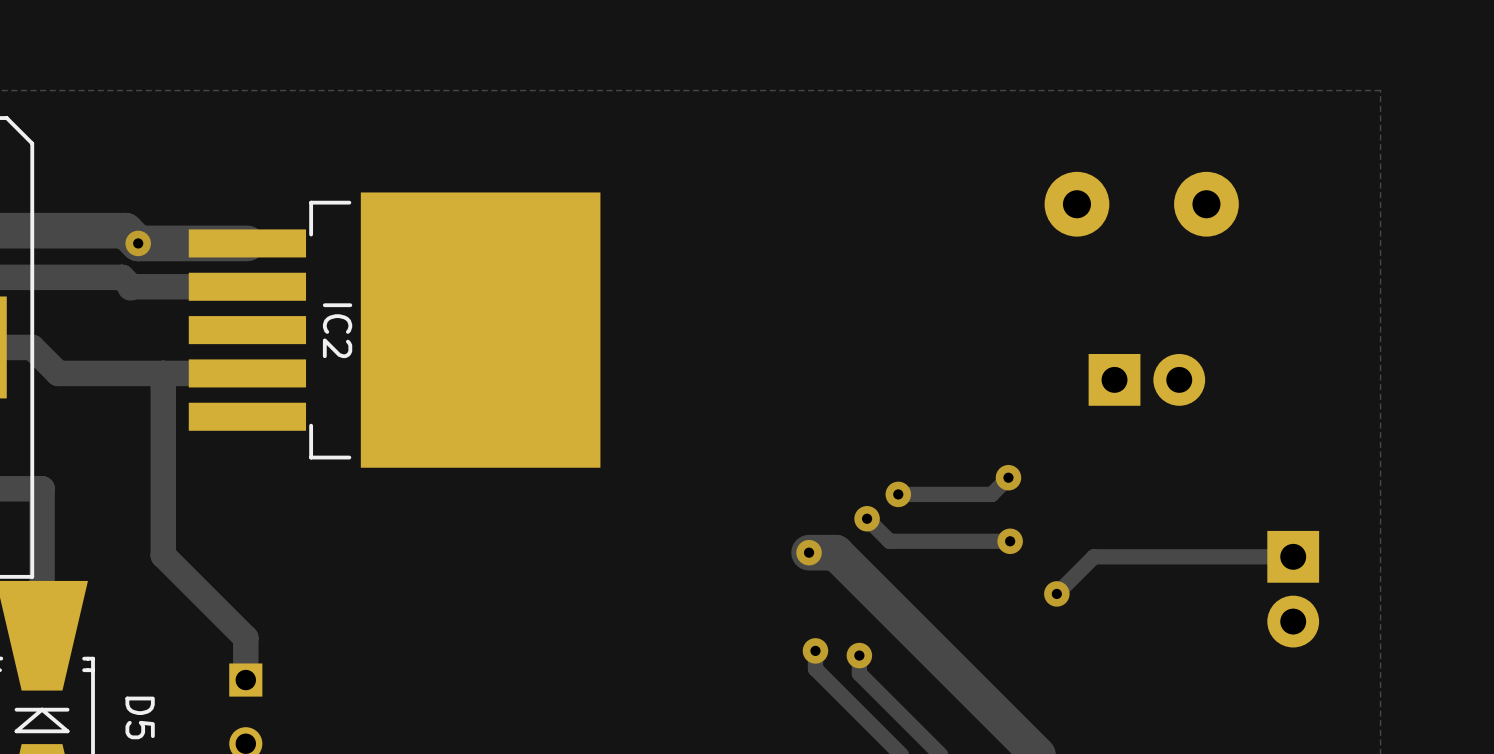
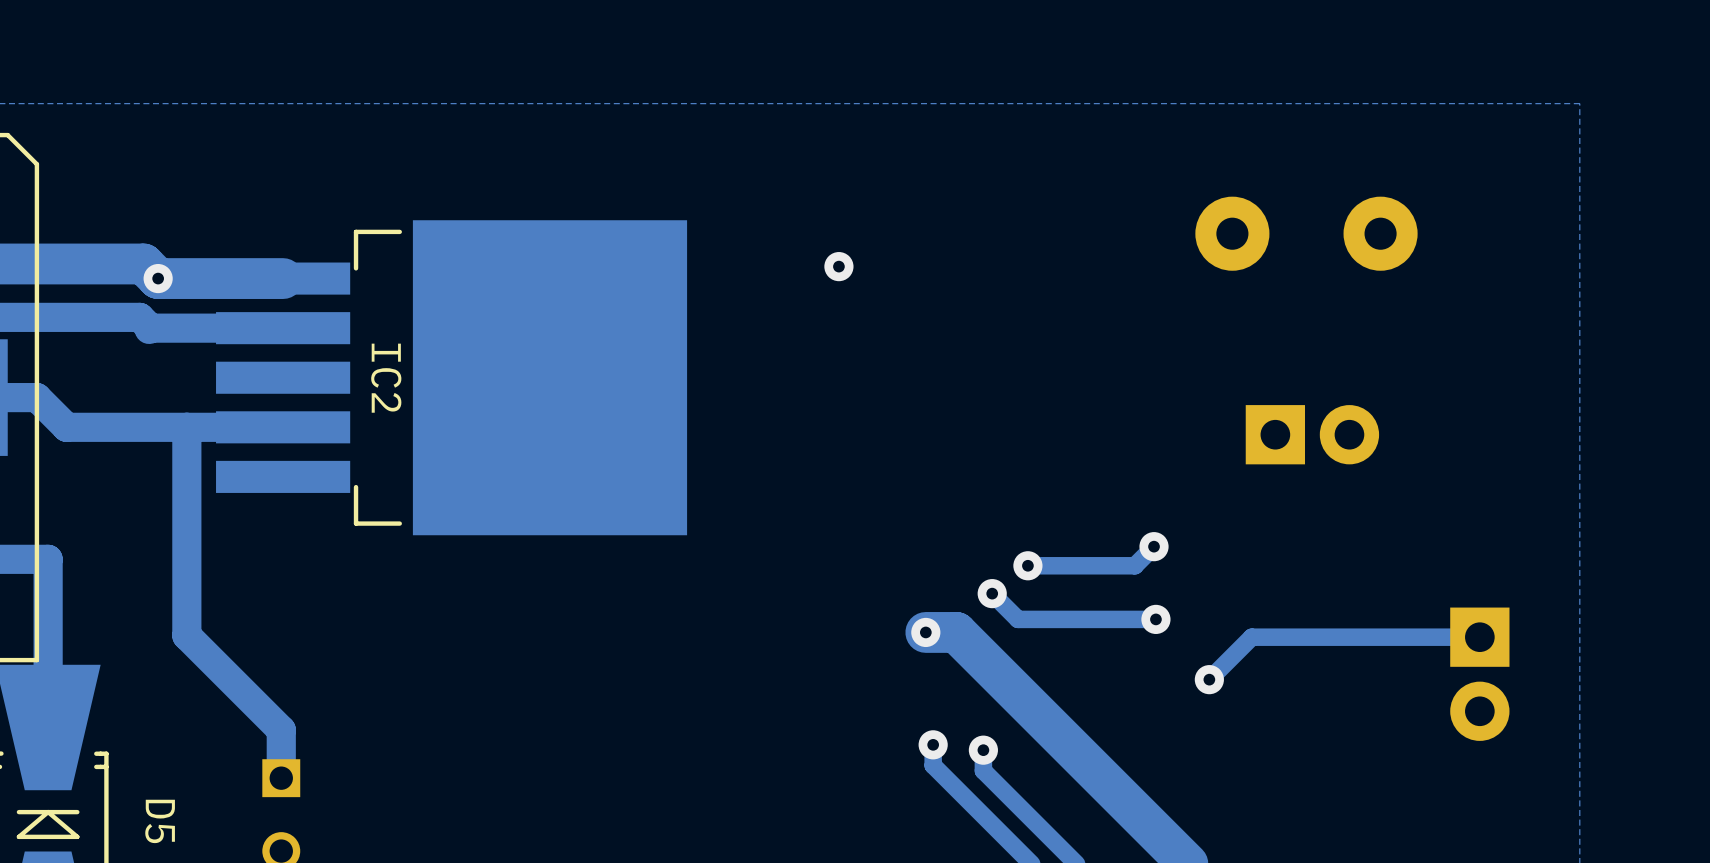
via: none -> (838, 266)

